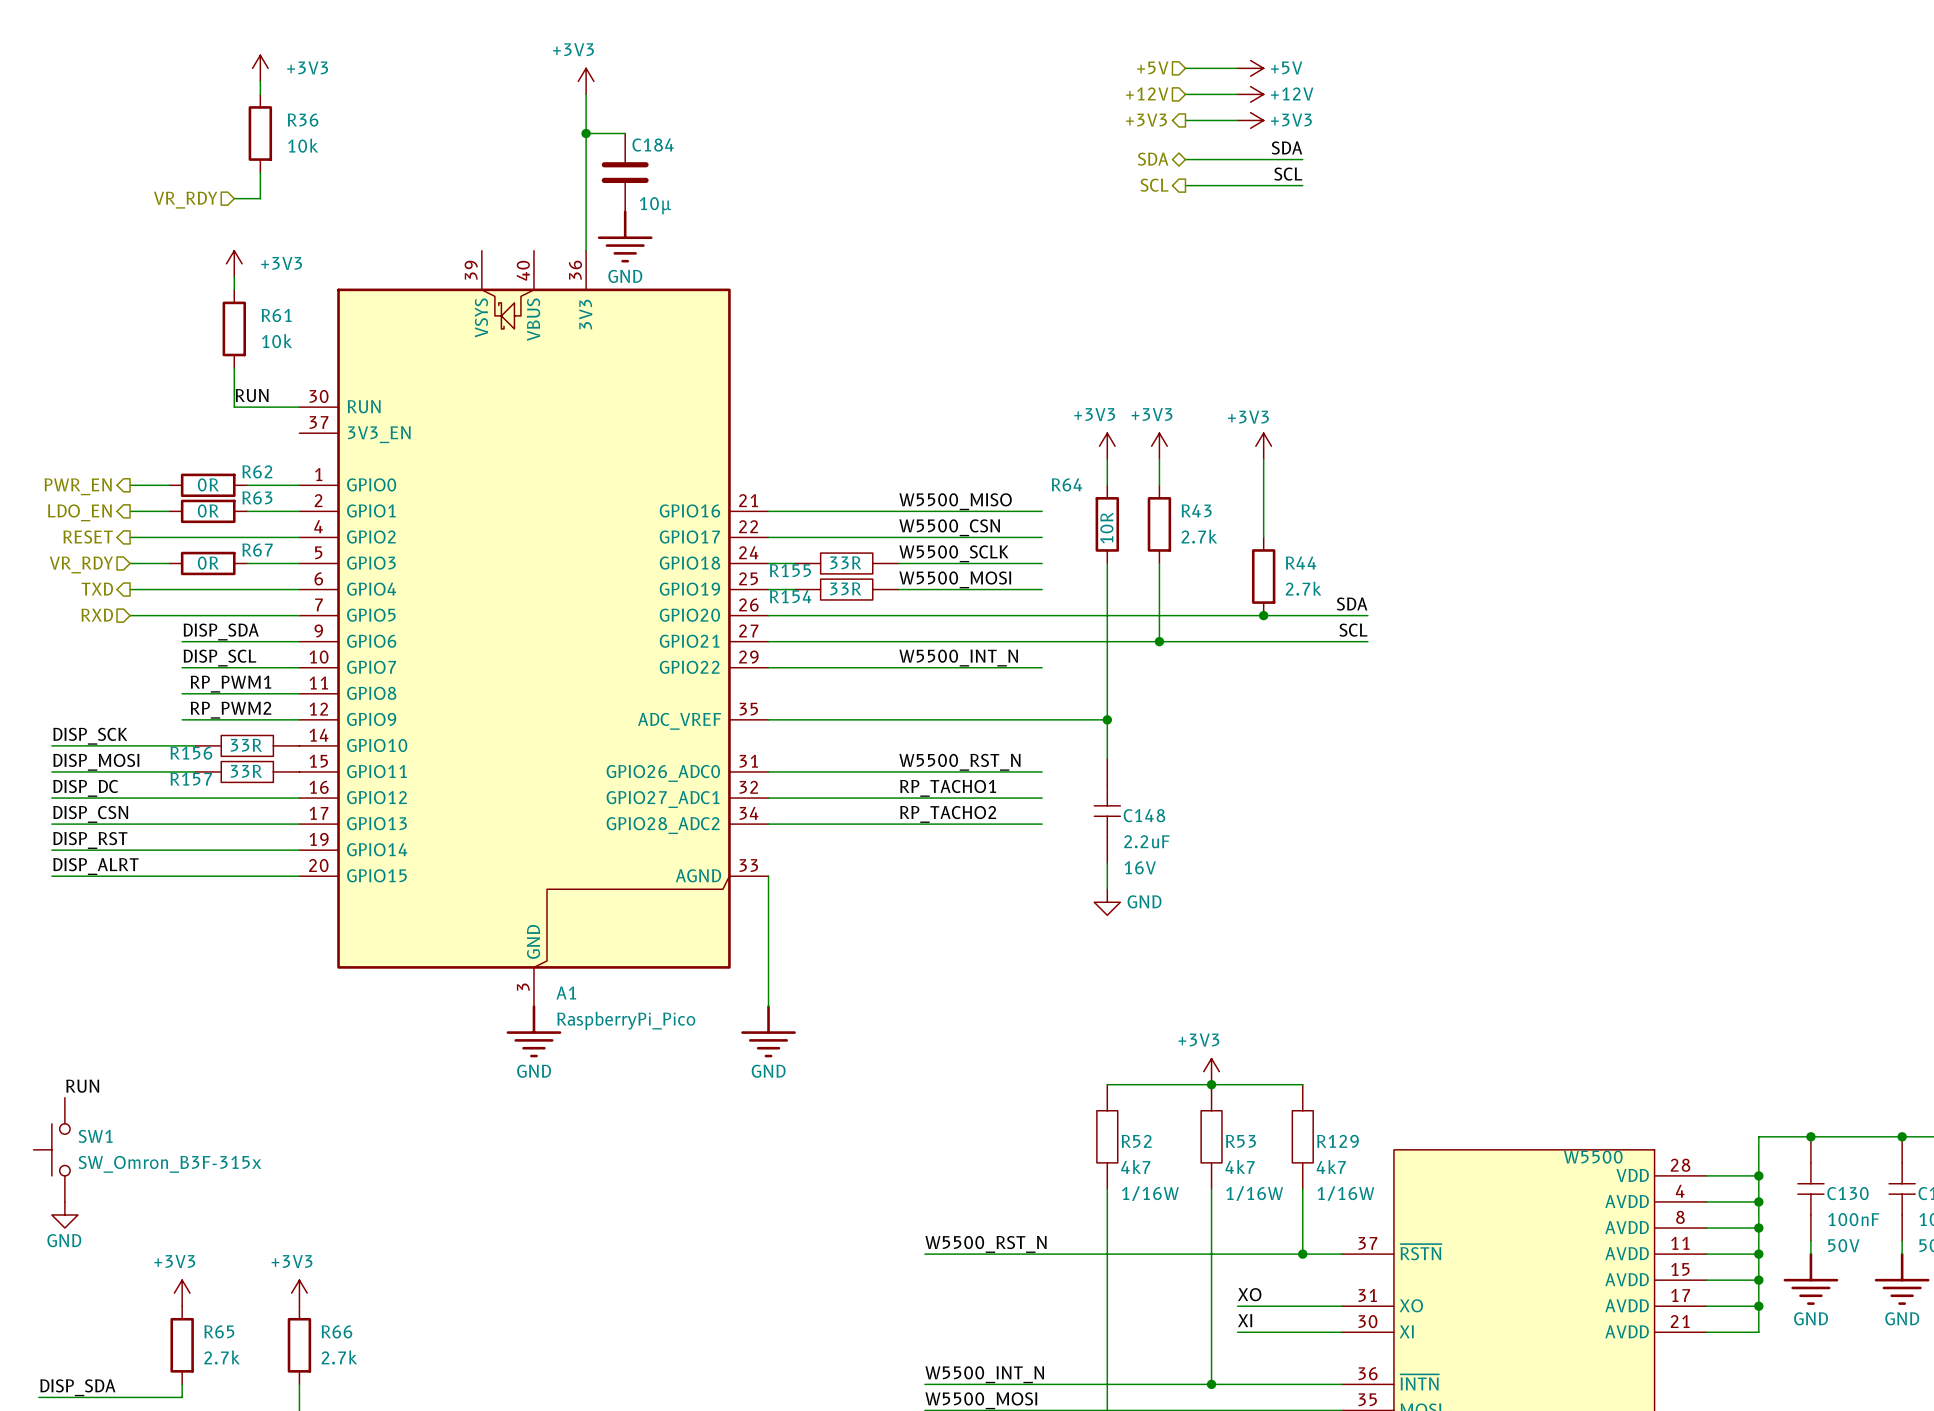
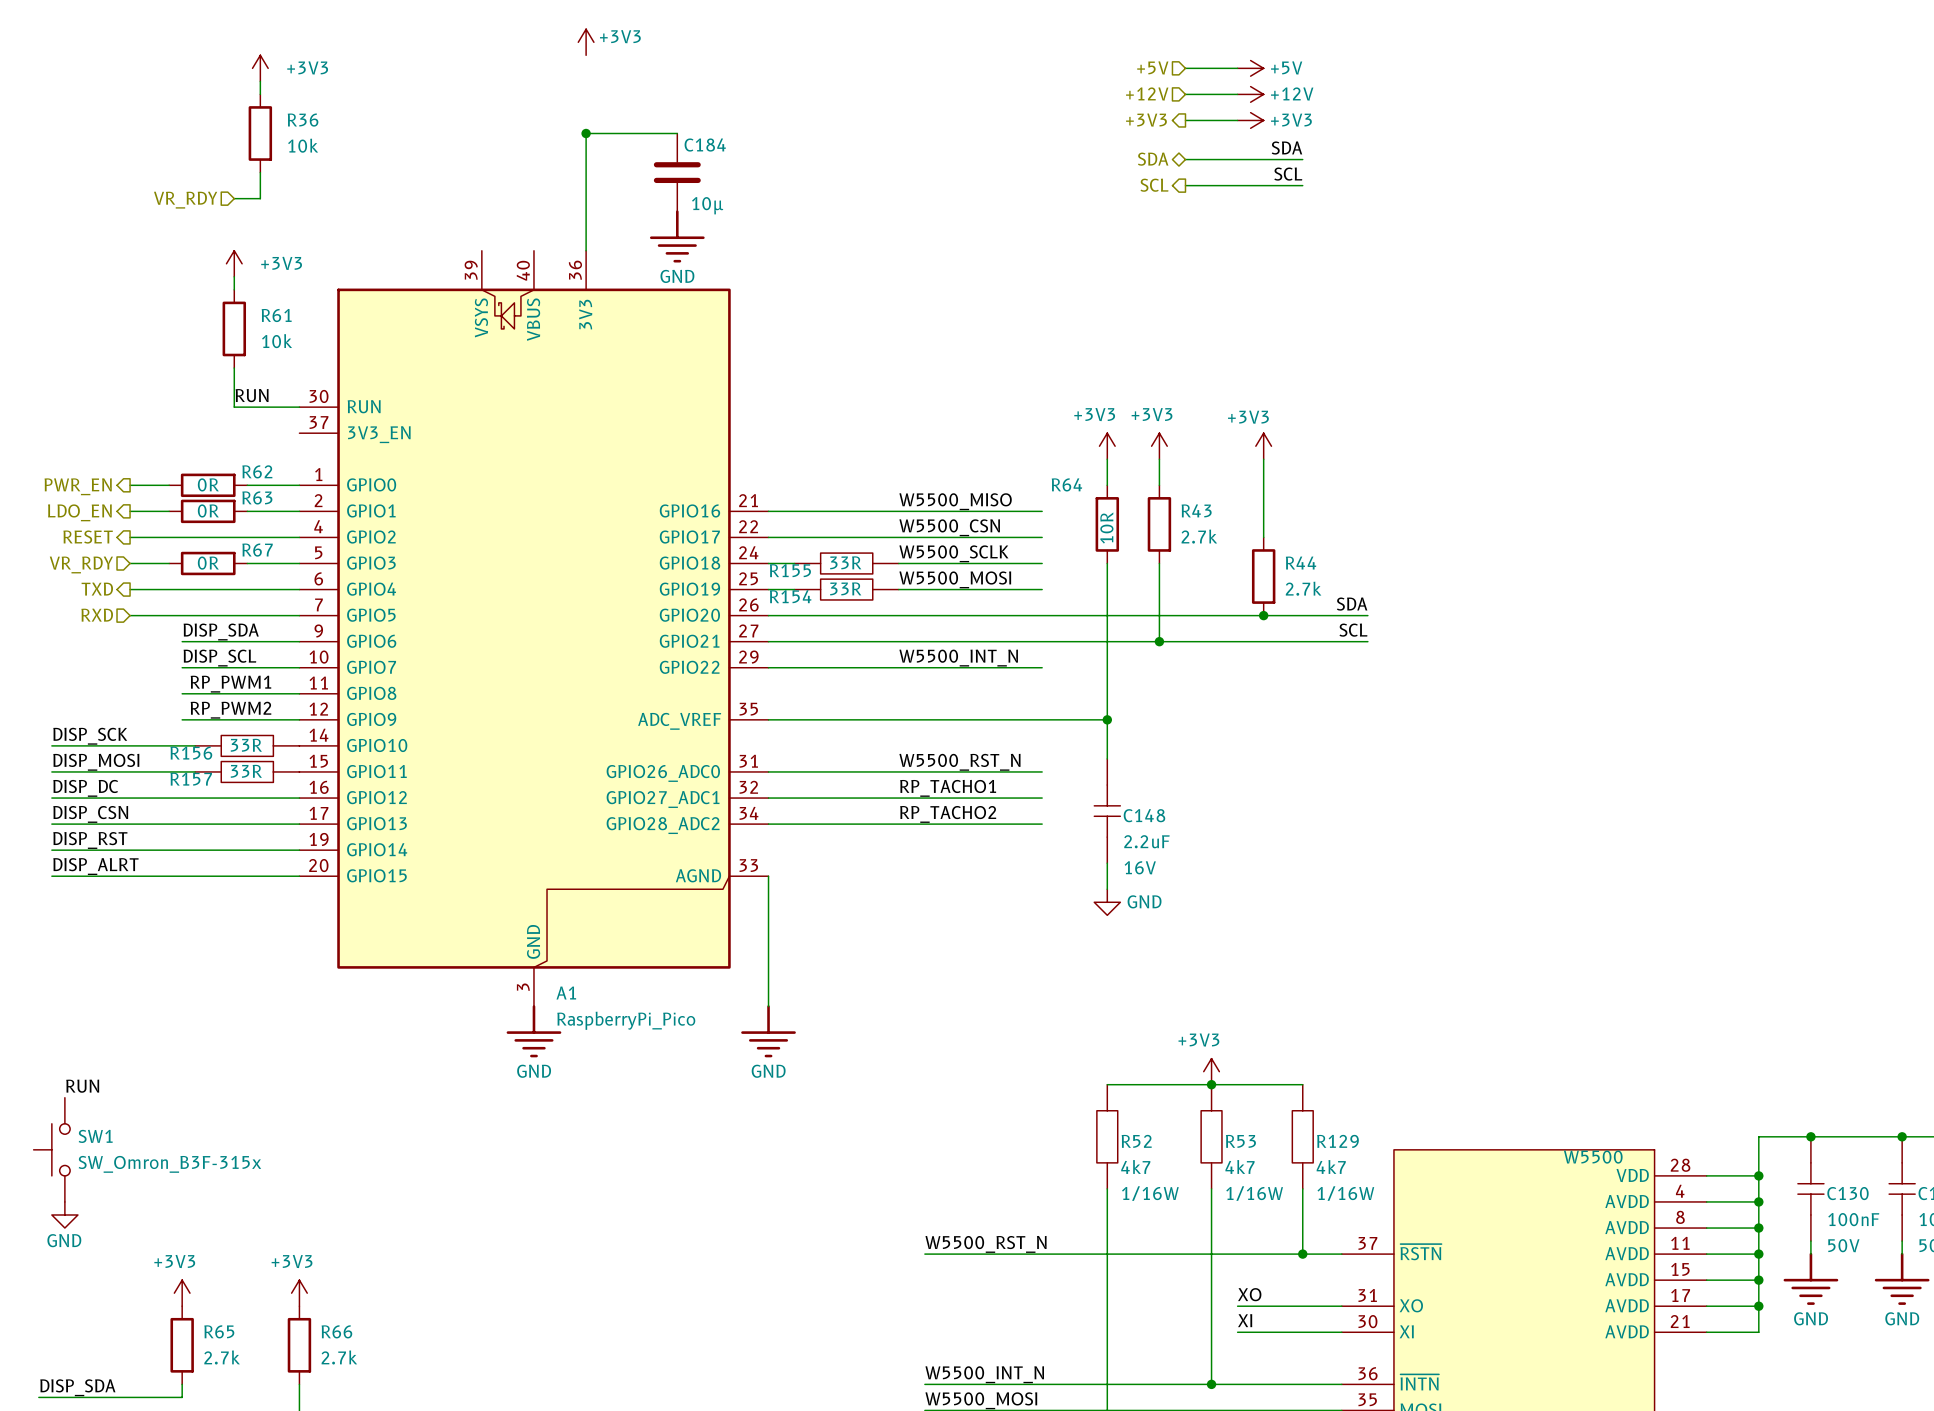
power symbol text position: +3V3 (573, 49) -> +3V3 (620, 36)
power symbol position: +3V3 (586, 81) -> +3V3 (586, 42)
wire: (586, 94) (586, 133) -> none
wire: none -> (625, 133) (677, 133)
C184 position: (625, 172) -> (677, 172)
power symbol position: GND (625, 236) -> GND (677, 236)

